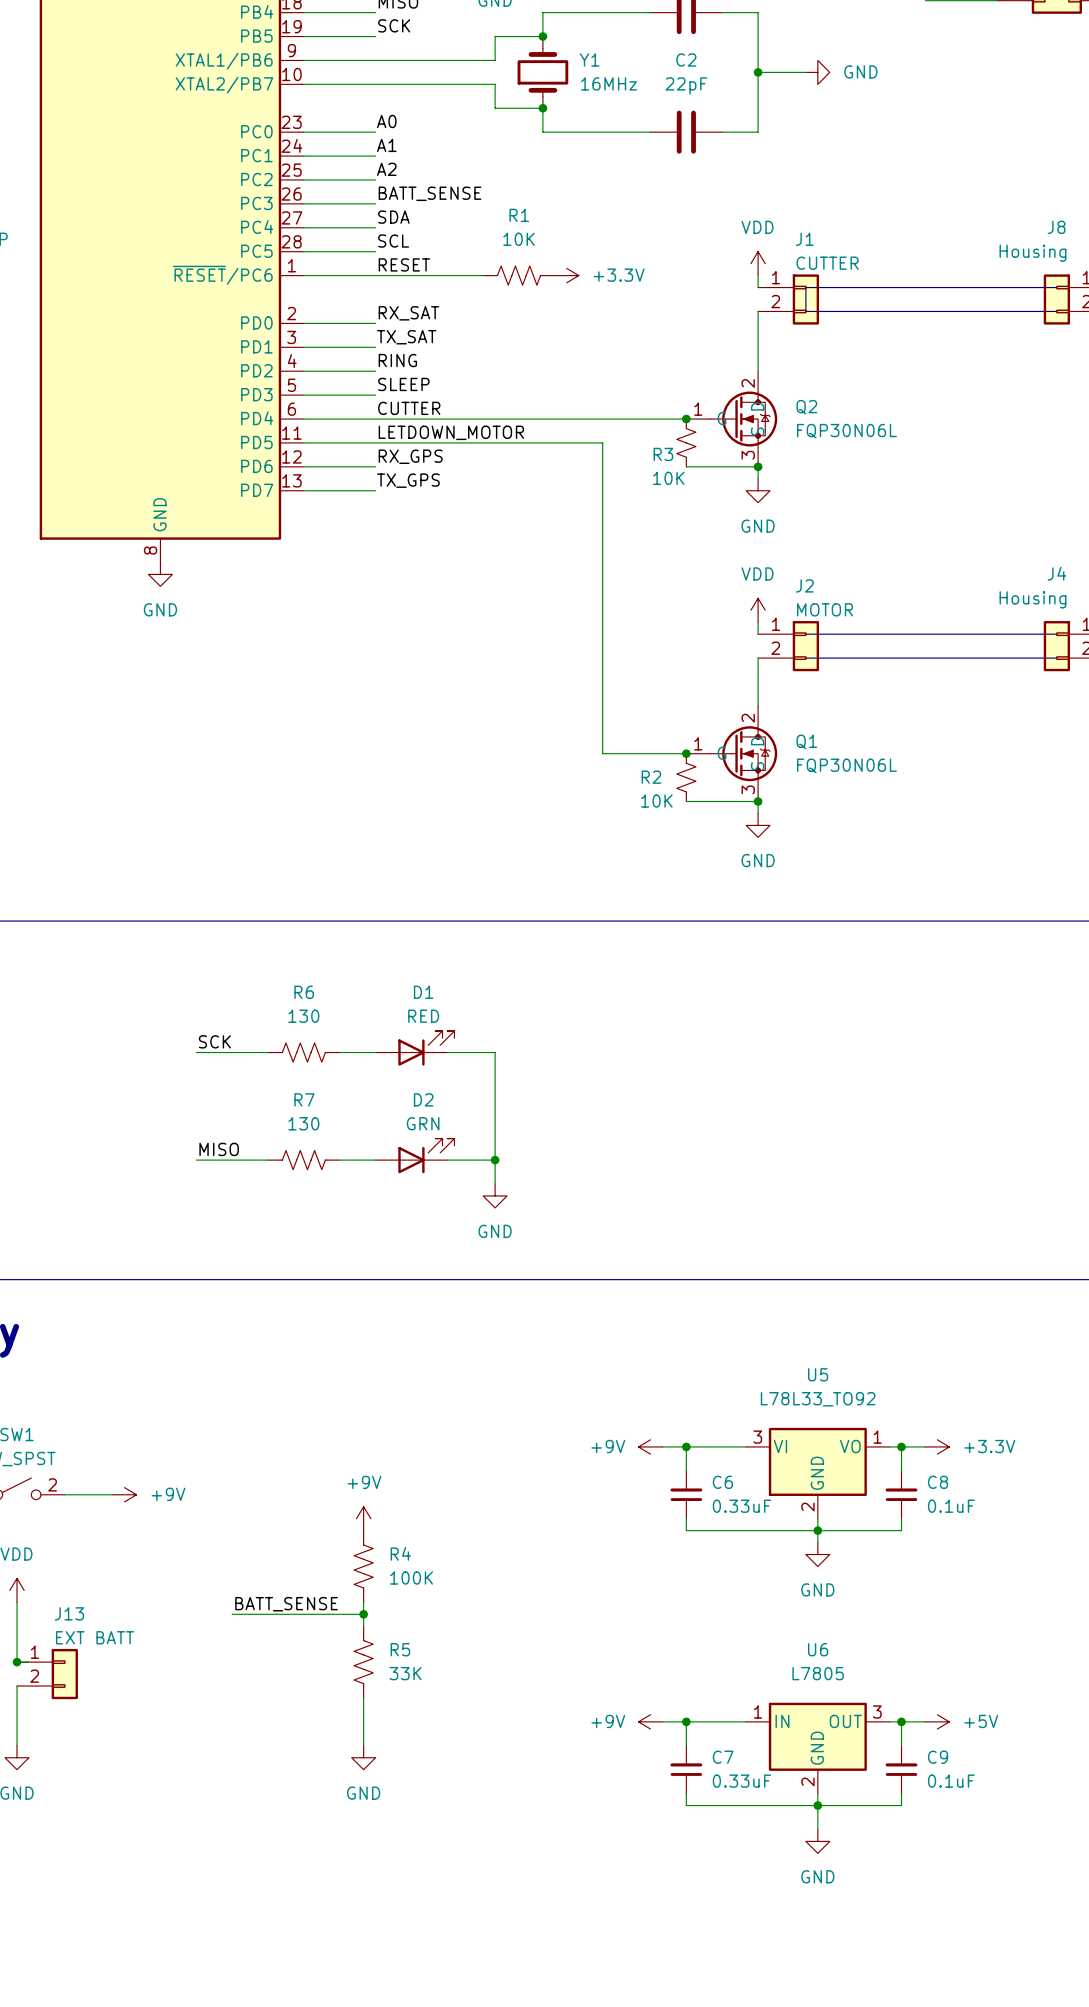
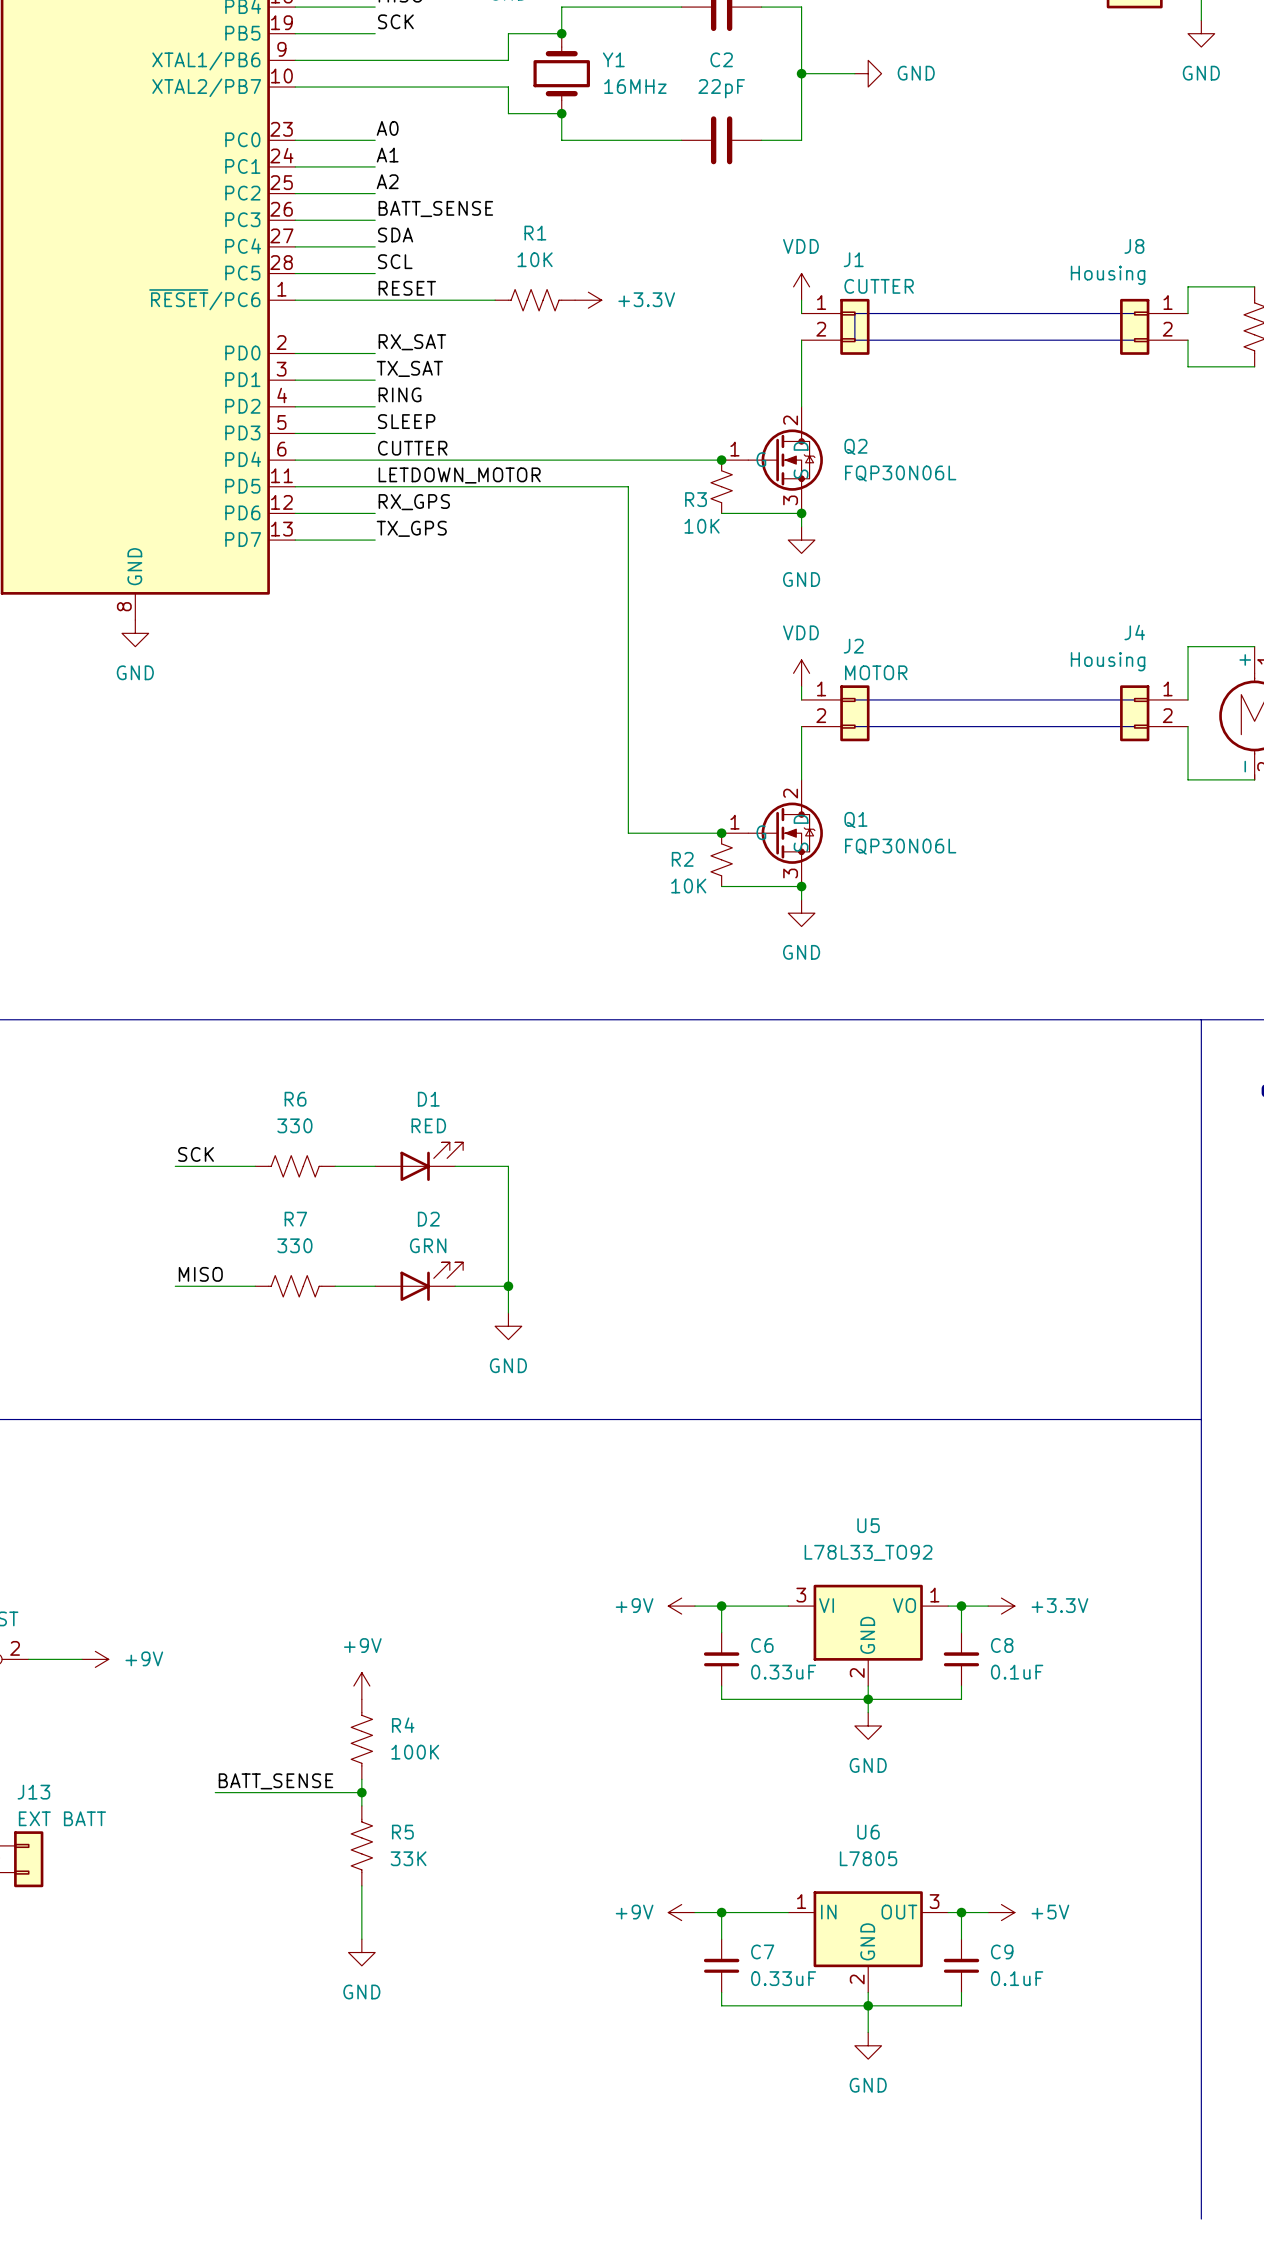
R6 value: 130 (303, 1016) -> 330 (294, 1125)
R7 value: 130 (303, 1123) -> 330 (294, 1245)

